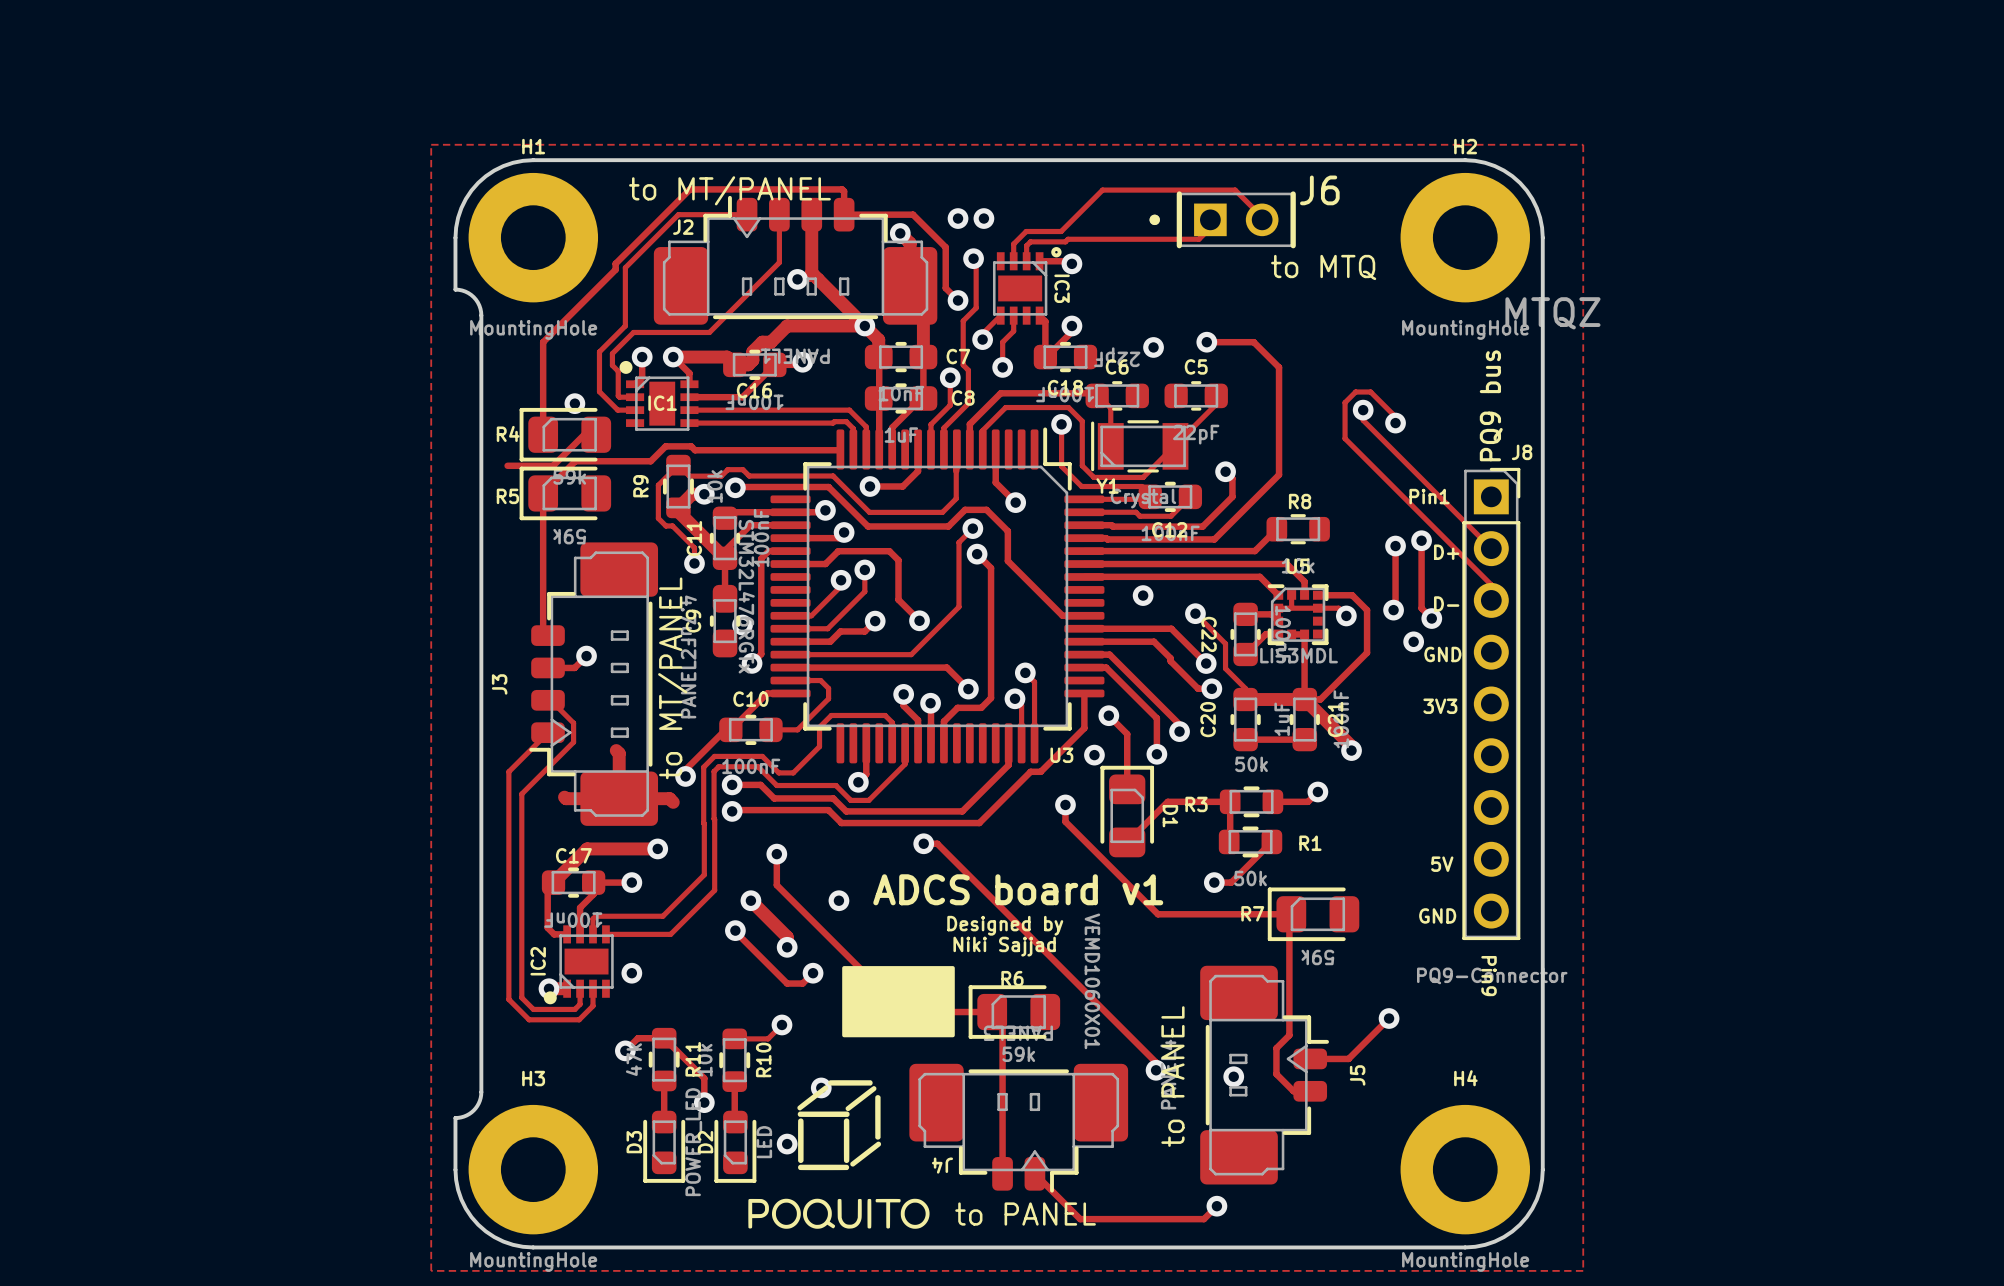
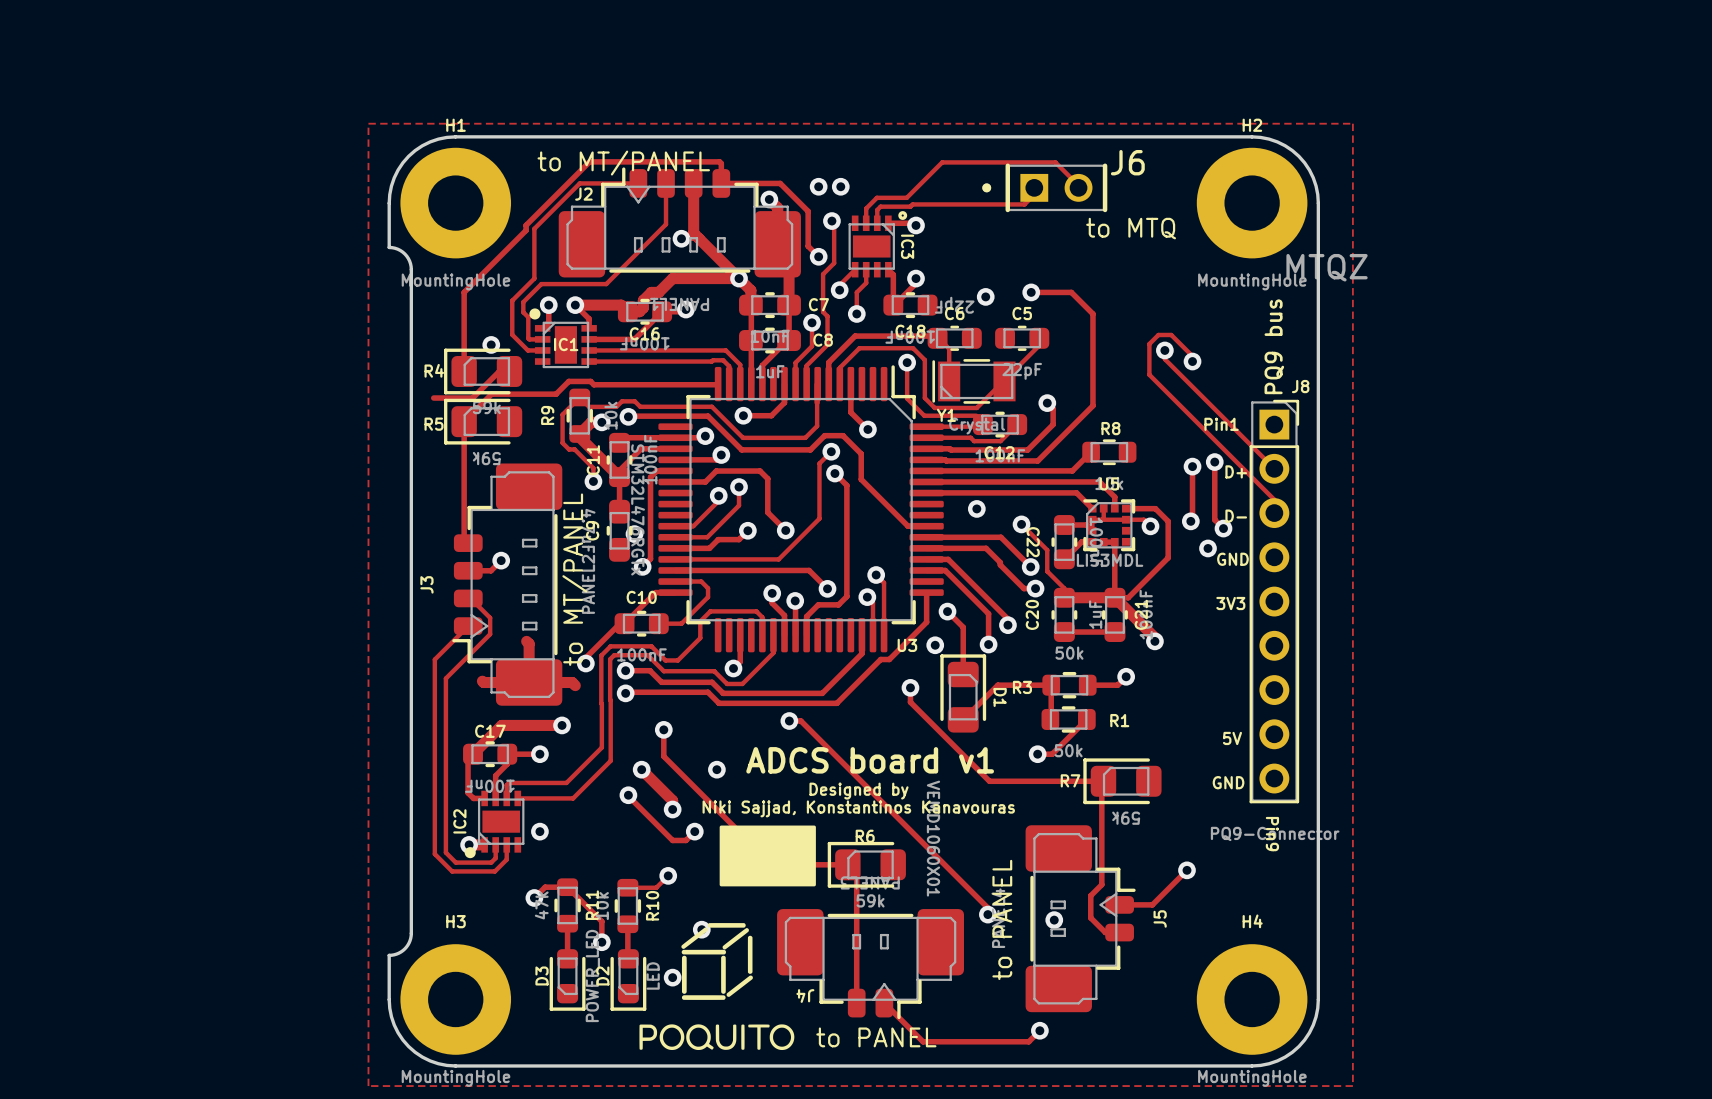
text: Niki Sajjad (1004, 946) -> Niki Sajjad, Konstantinos Kanavouras (858, 808)

